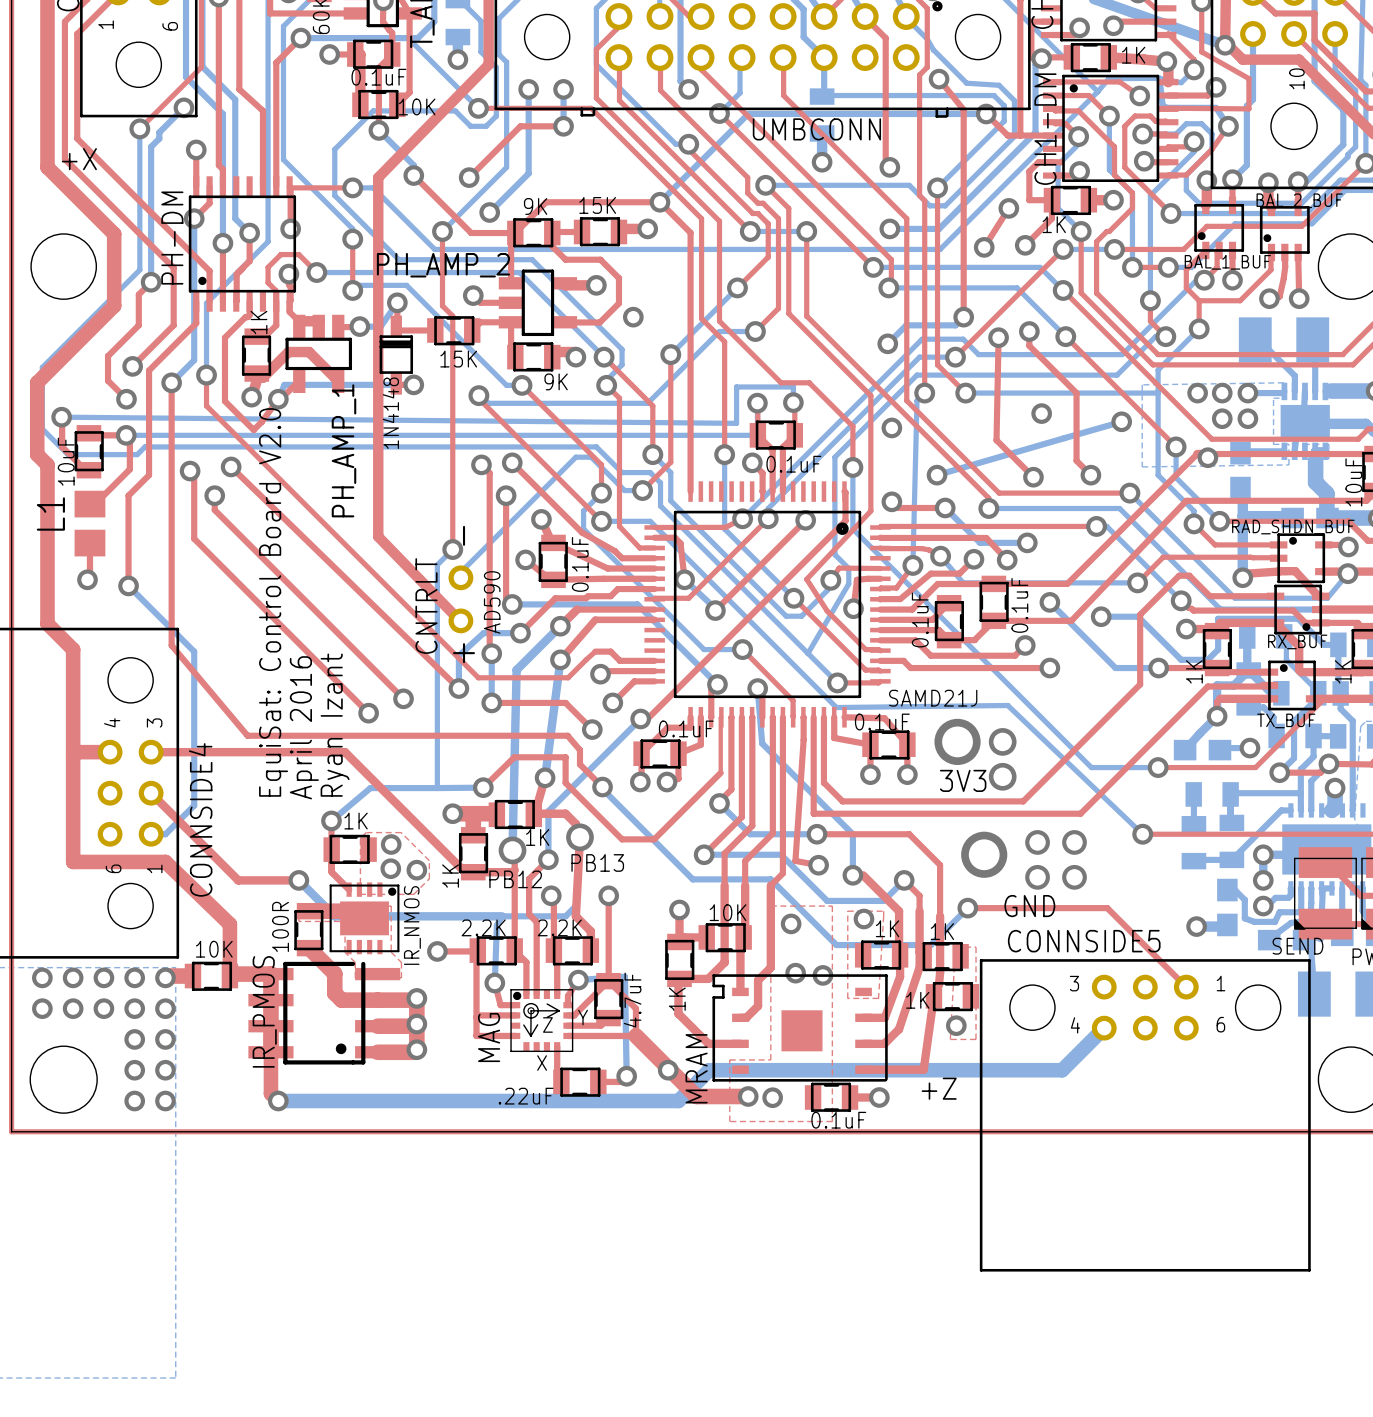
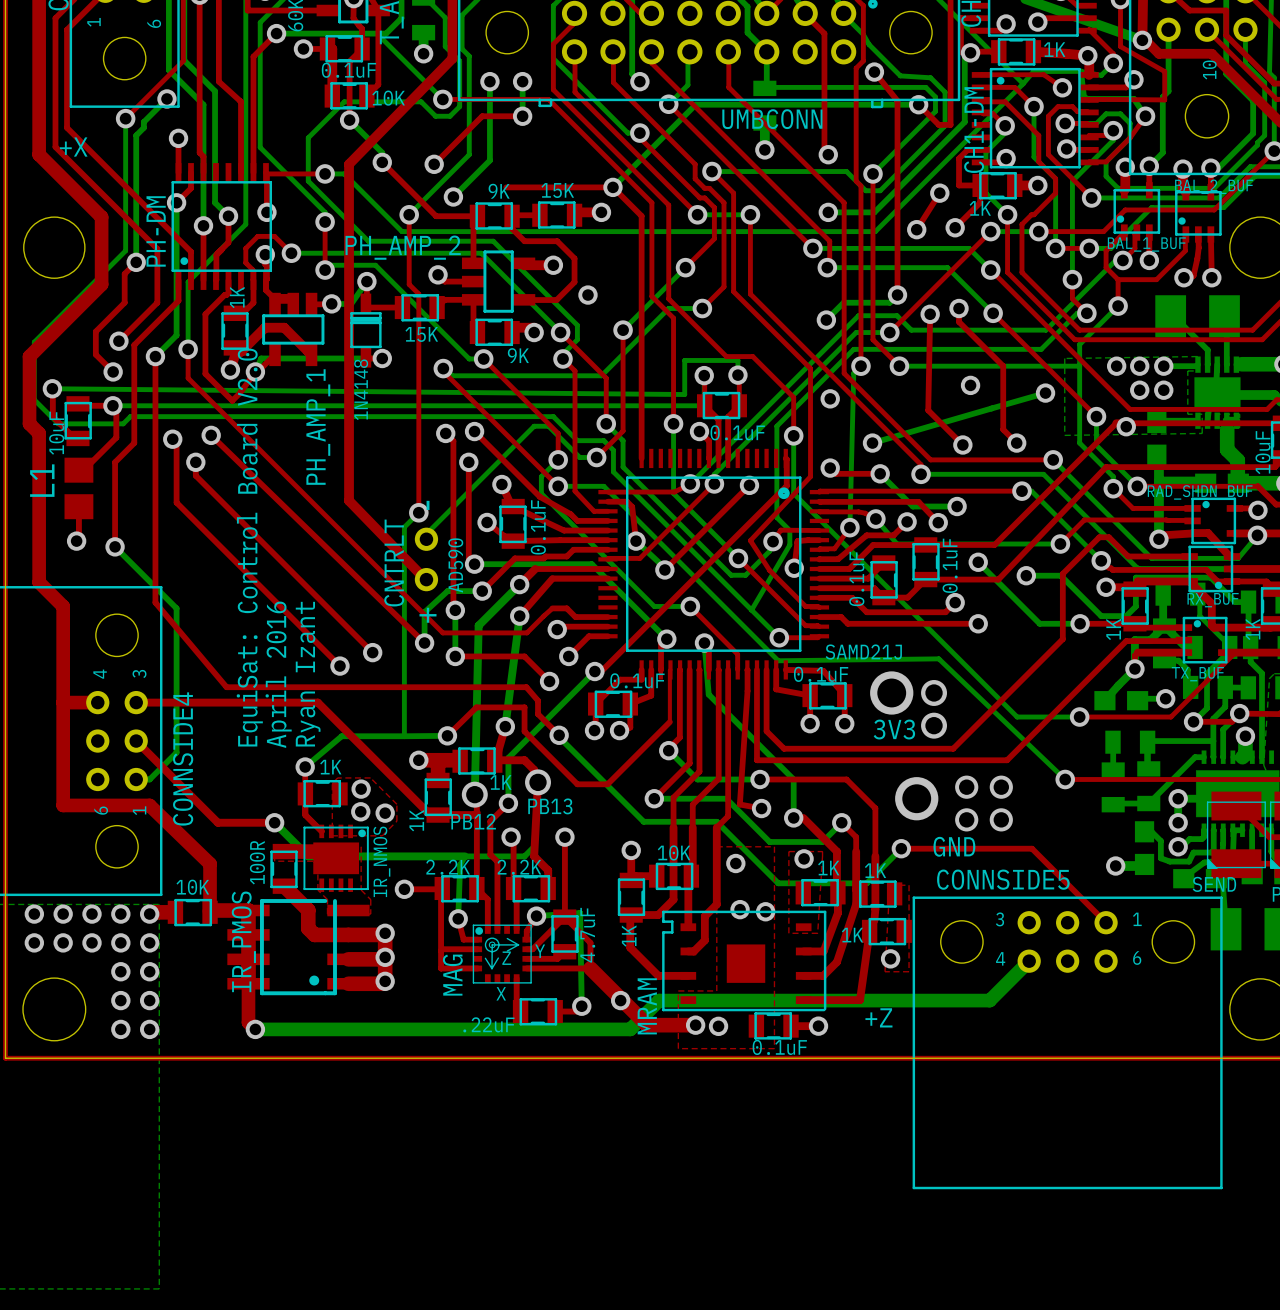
top track: (1020, 135) (1053, 135) -> none
top track: (546, 202) (515, 233) -> none

